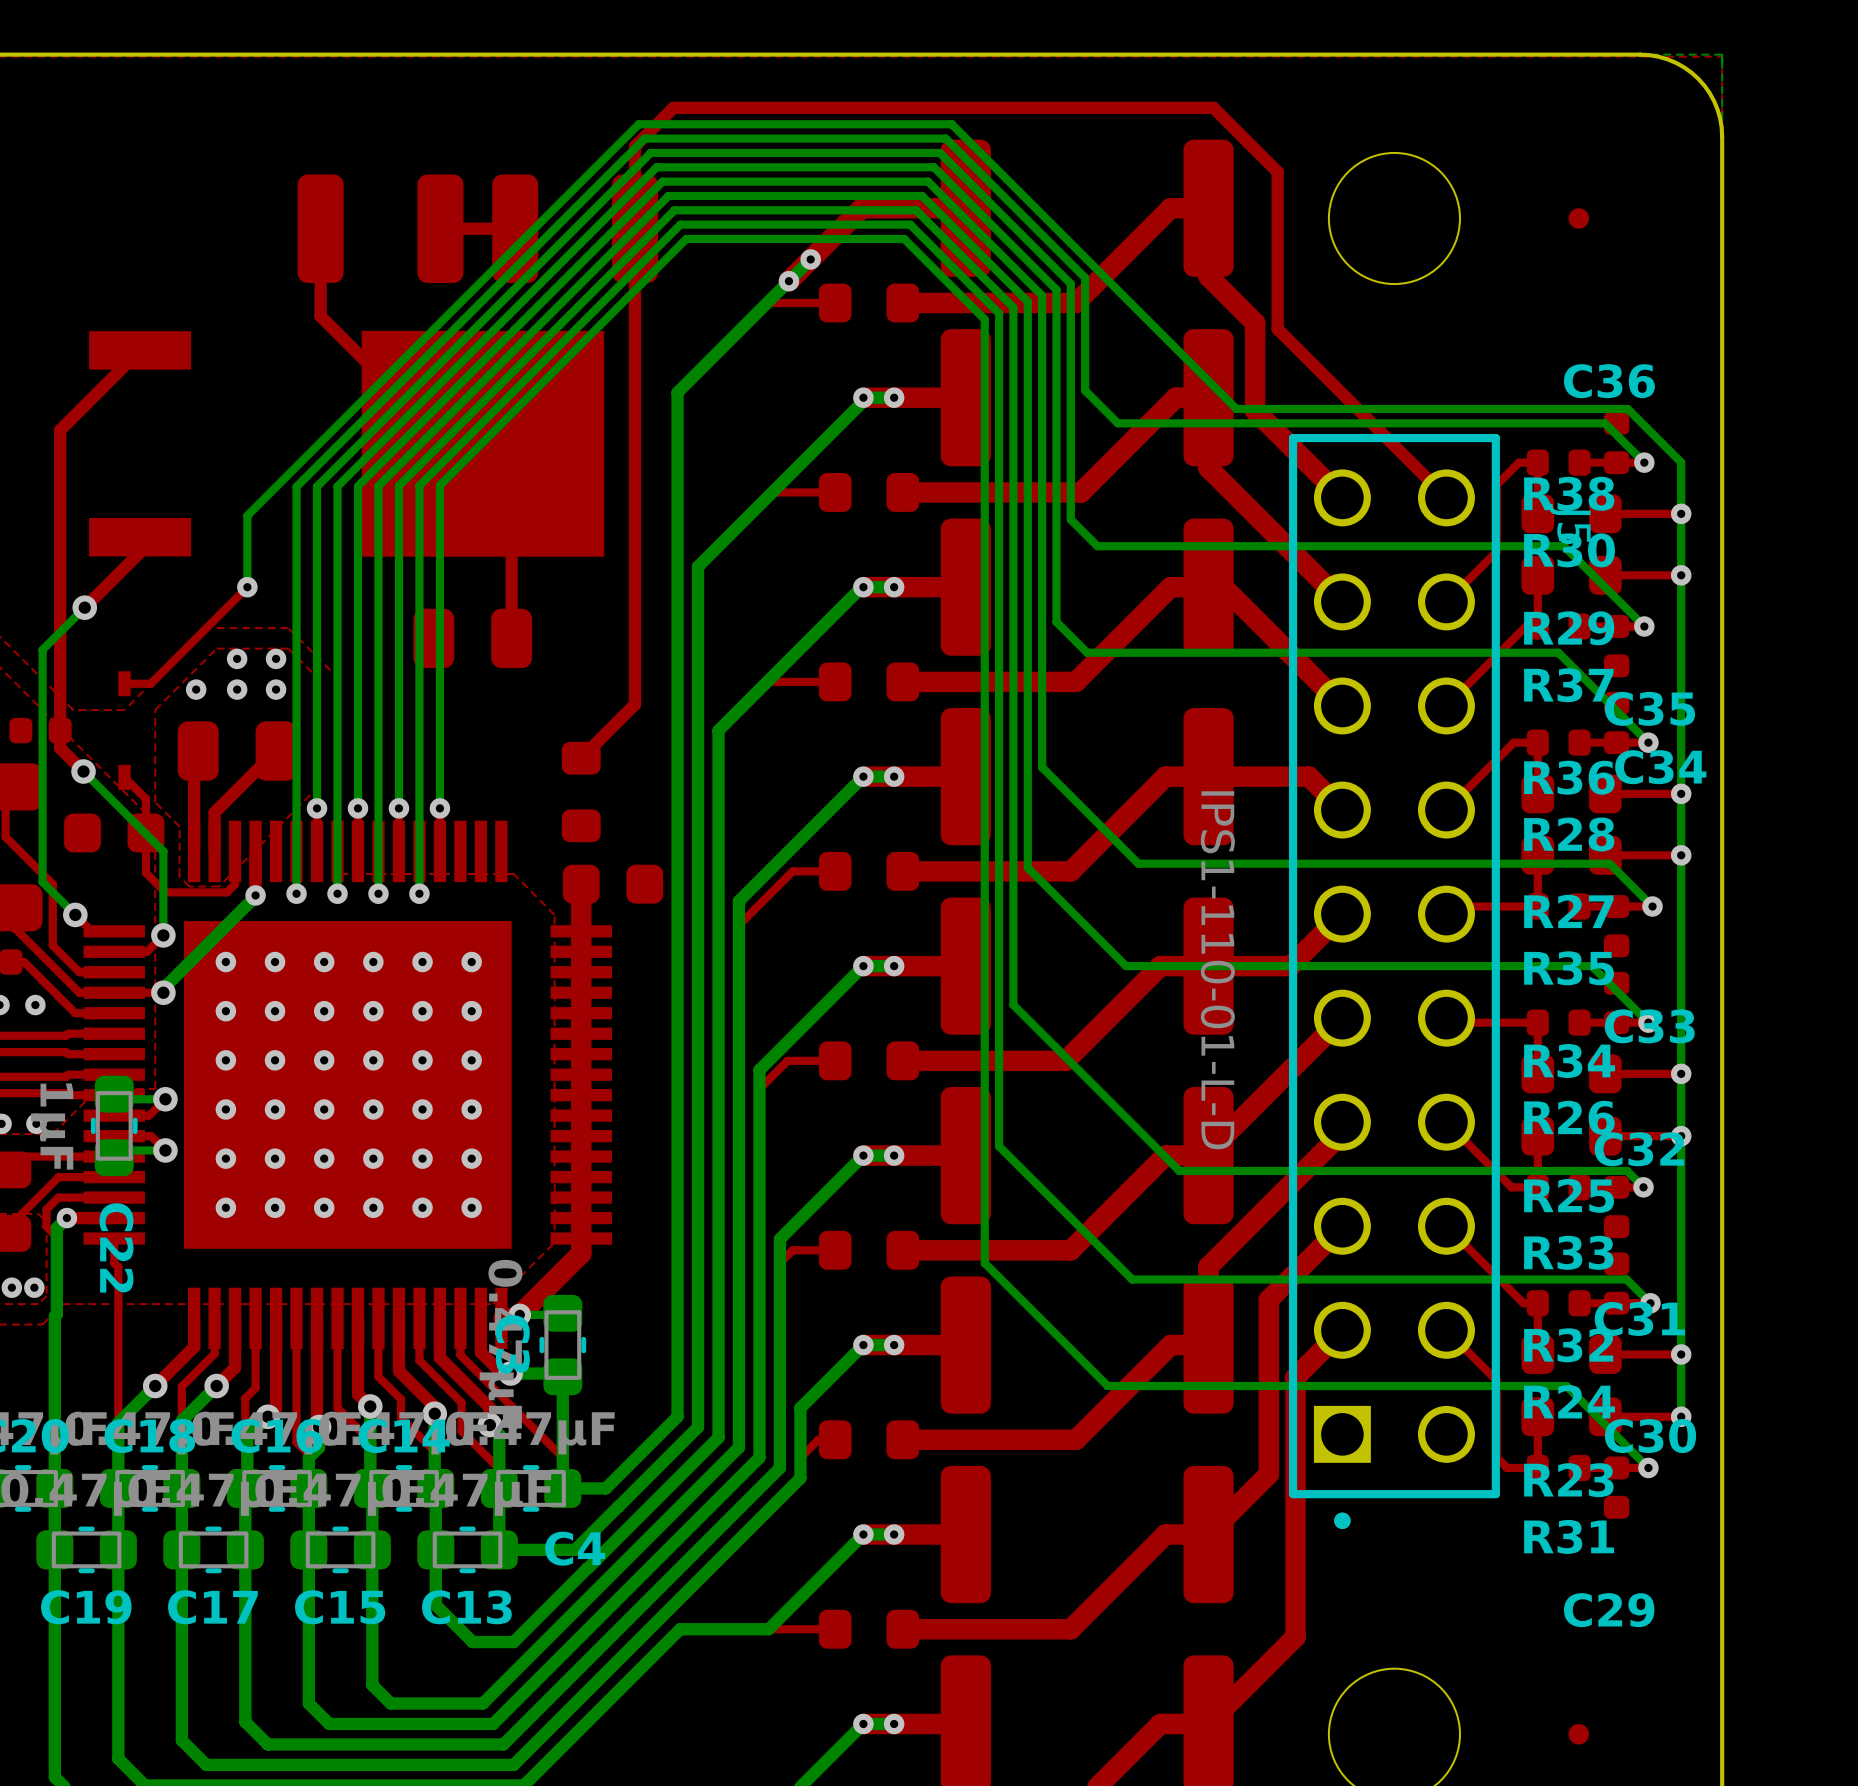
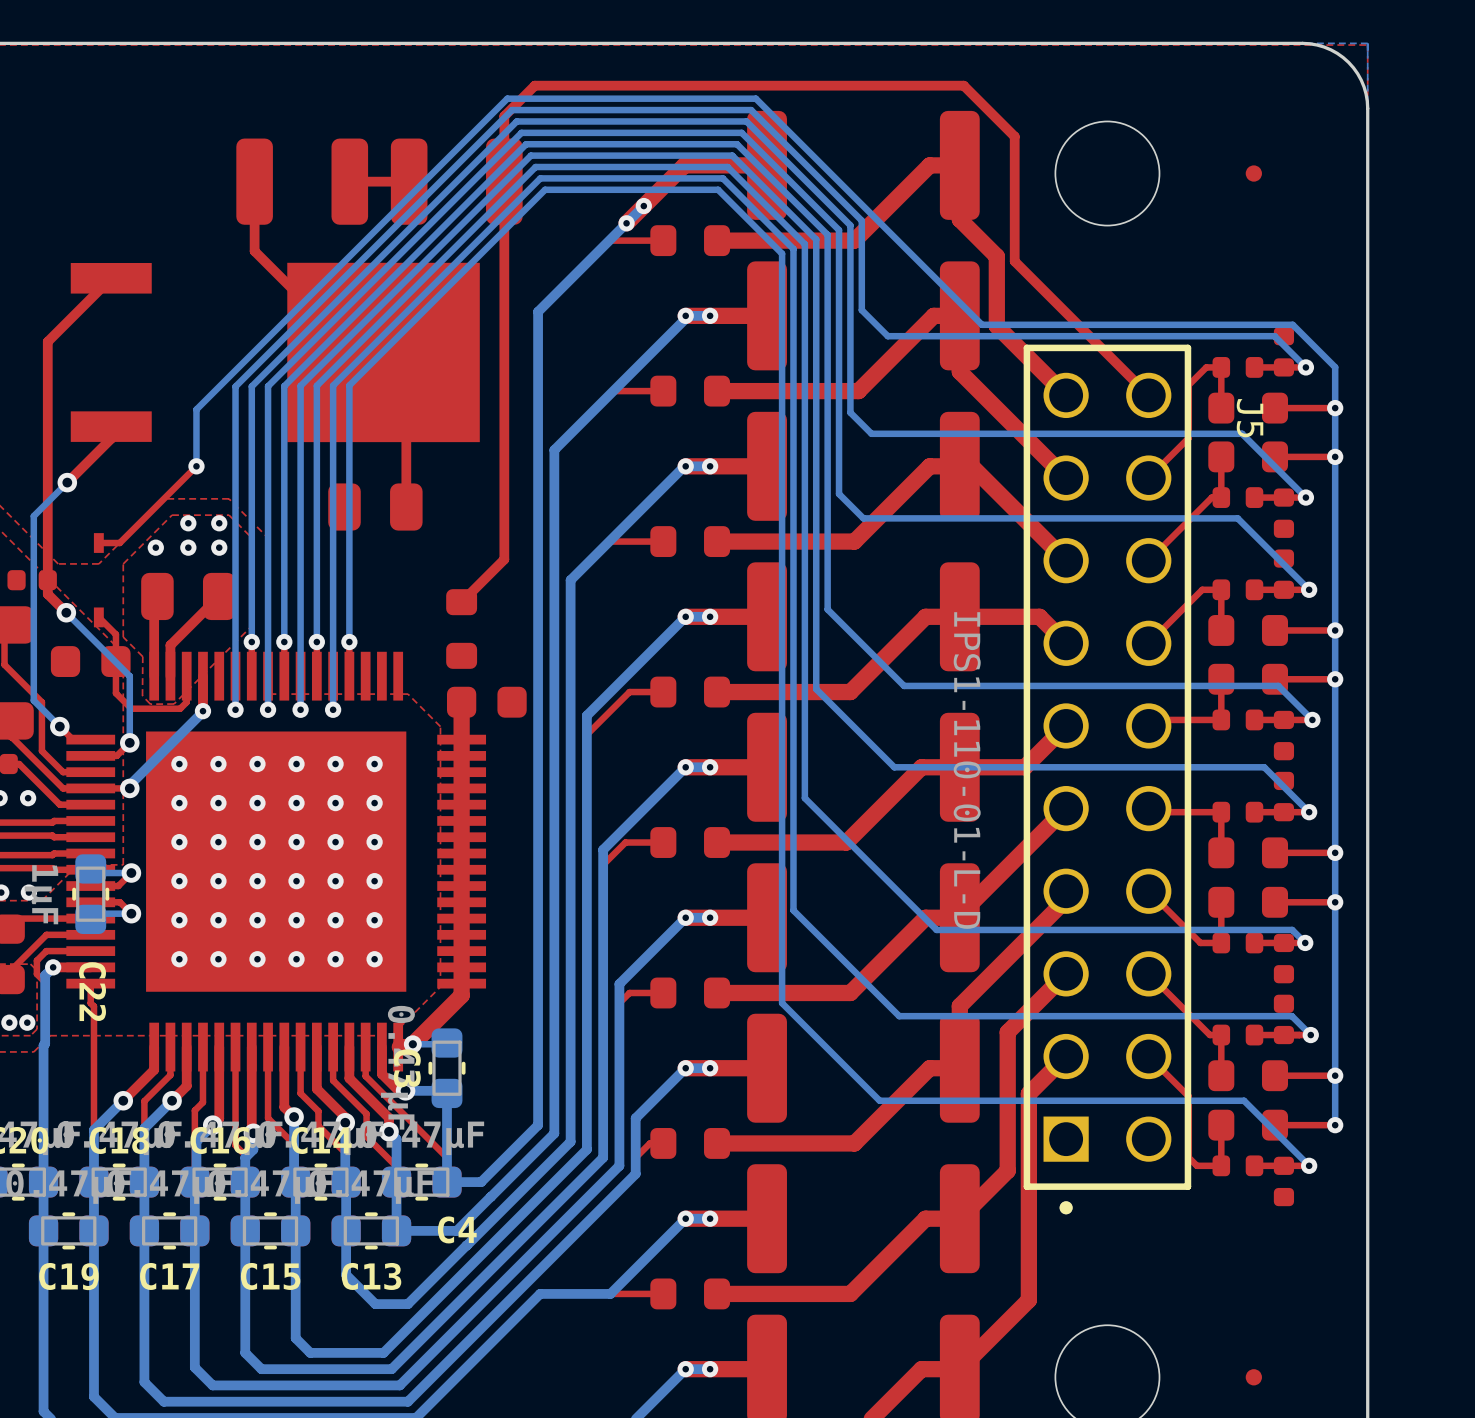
C36 name: C36 (1609, 381) -> none
R38 name: R38 (1569, 493) -> none
R30 name: R30 (1569, 550) -> none
R29 name: R29 (1569, 628) -> none
R37 name: R37 (1568, 685) -> none
C35 name: C35 (1650, 708) -> none
C34 name: C34 (1660, 767) -> none
R36 name: R36 (1569, 777) -> none
R28 name: R28 (1569, 834) -> none
R27 name: R27 (1568, 911) -> none
R35 name: R35 (1569, 968) -> none
C33 name: C33 (1649, 1026) -> none
R34 name: R34 (1569, 1061) -> none
R26 name: R26 (1569, 1117) -> none
C32 name: C32 (1639, 1149) -> none
R25 name: R25 (1569, 1195) -> none
R33 name: R33 (1568, 1252) -> none
C31 name: C31 (1639, 1318) -> none
R32 name: R32 (1568, 1345) -> none
R24 name: R24 (1569, 1401) -> none
C30 name: C30 (1650, 1436) -> none
R23 name: R23 (1568, 1480) -> none
R31 name: R31 (1569, 1536) -> none
C29 name: C29 (1609, 1610) -> none

